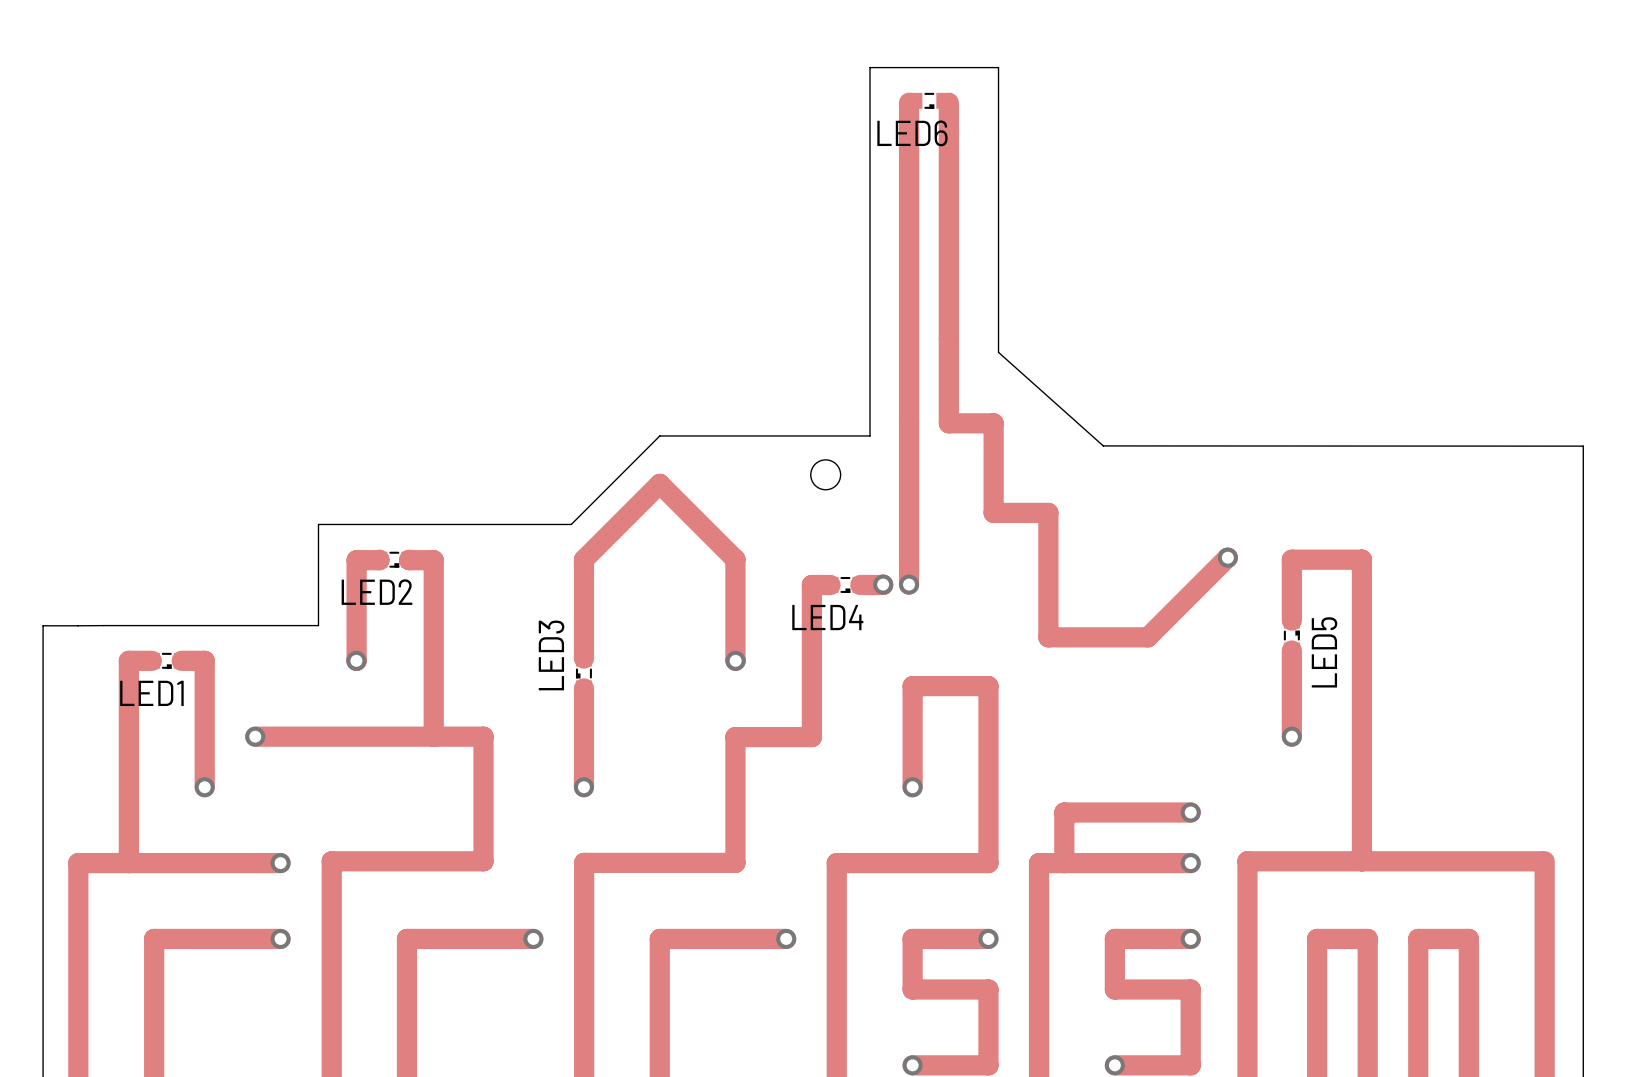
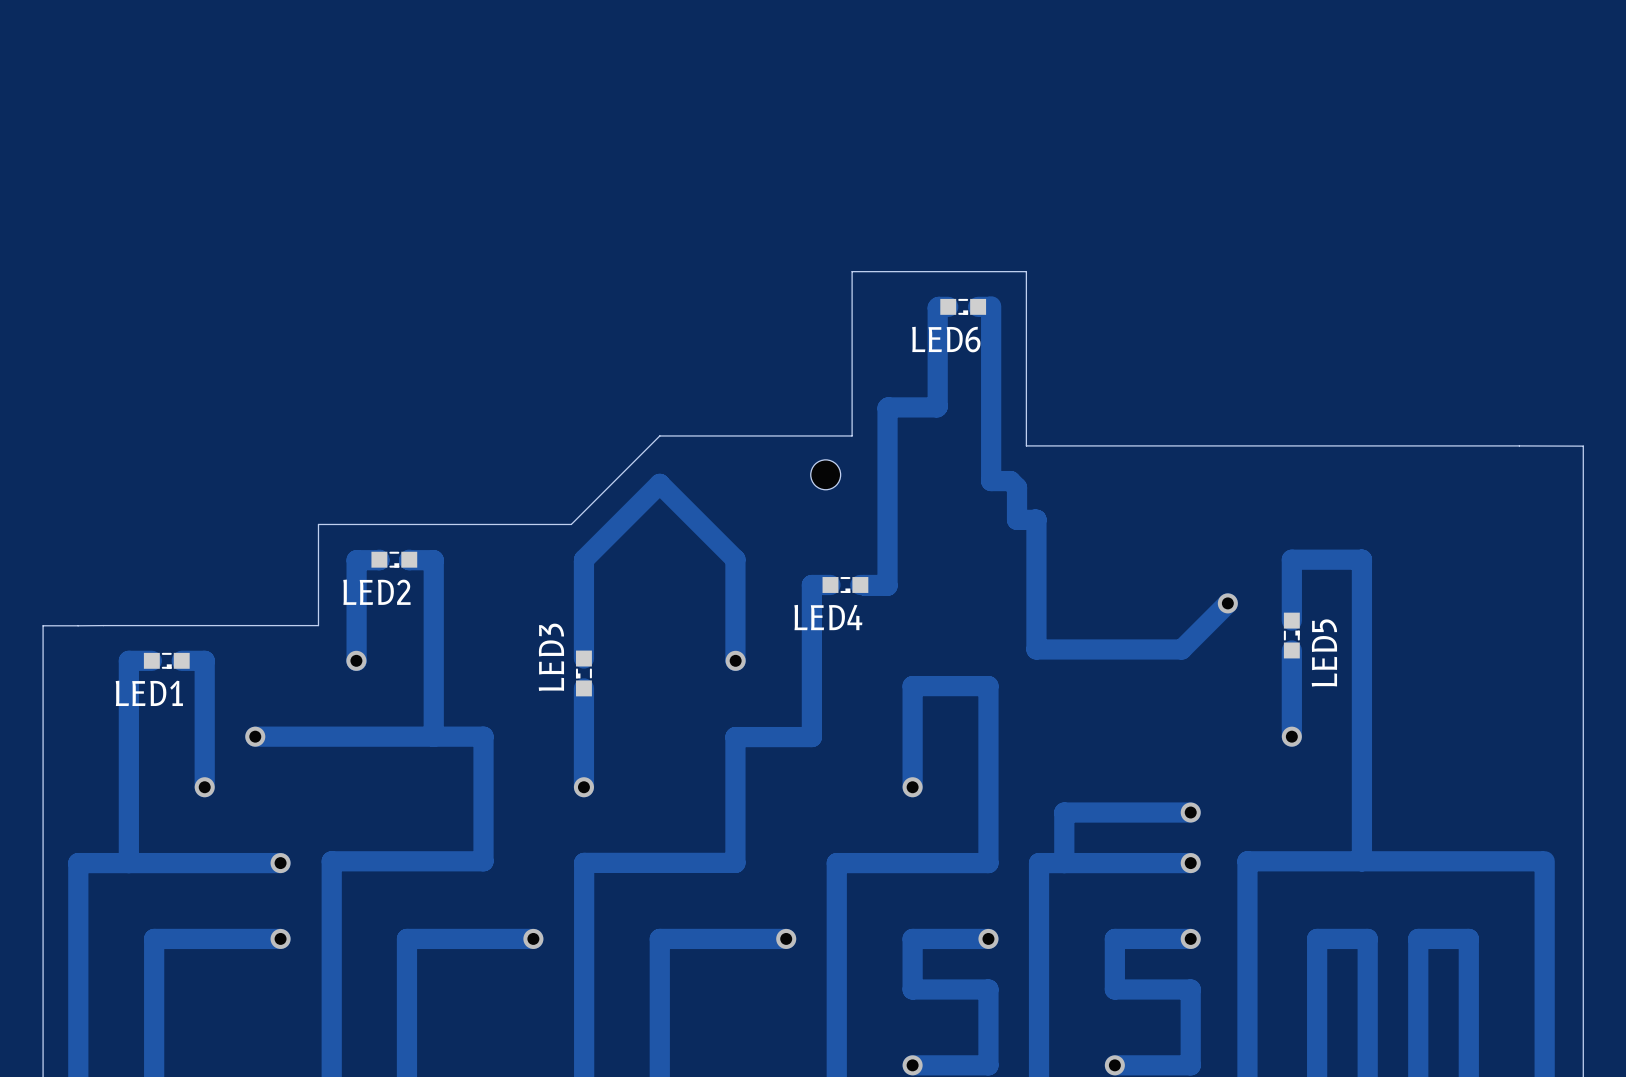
LED6 position: (929, 100) -> (963, 306)
track: (909, 102) (909, 584) -> none
track: (948, 102) (948, 423) (993, 423) (993, 512) (1048, 512) (1048, 637) (1147, 637) (1227, 557) -> none
track: none -> (948, 306) (937, 307) (937, 406) (887, 408) (887, 585) (864, 584)
track: none -> (988, 306) (978, 306) (991, 306) (991, 481) (1010, 481) (1017, 487) (1017, 519) (1036, 519)
board edge: (852, 435) (870, 435) (870, 67) (998, 67) (998, 352) (1103, 445) (1583, 446) -> (852, 435) (852, 271) (1026, 271) (1026, 445) (1583, 446)
track: none -> (1034, 519) (1036, 519) (1036, 649) (1181, 649) (1227, 603)
via position: (1227, 557) -> (1227, 603)
via: (883, 584) -> none
via: (909, 584) -> none

